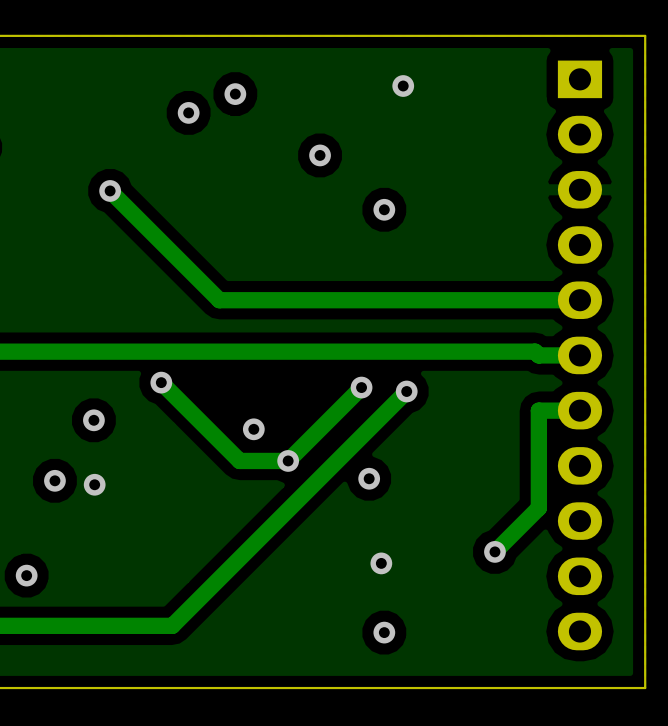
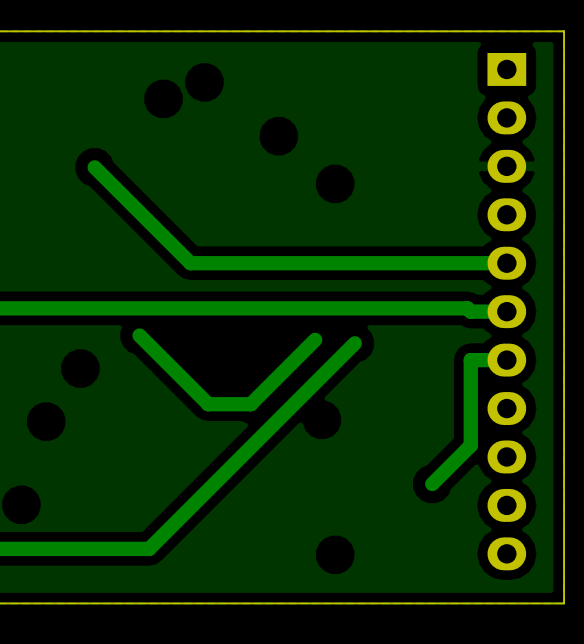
via: (403, 86) -> none
via: (235, 94) -> none
via: (188, 112) -> none
via: (320, 155) -> none
via: (110, 190) -> none
via: (384, 209) -> none
via: (161, 382) -> none
via: (361, 387) -> none
via: (406, 391) -> none
via: (93, 420) -> none
via: (253, 429) -> none
via: (288, 460) -> none
via: (369, 478) -> none
via: (54, 480) -> none
via: (94, 484) -> none
via: (494, 551) -> none
via: (381, 563) -> none
via: (26, 575) -> none
via: (384, 632) -> none

